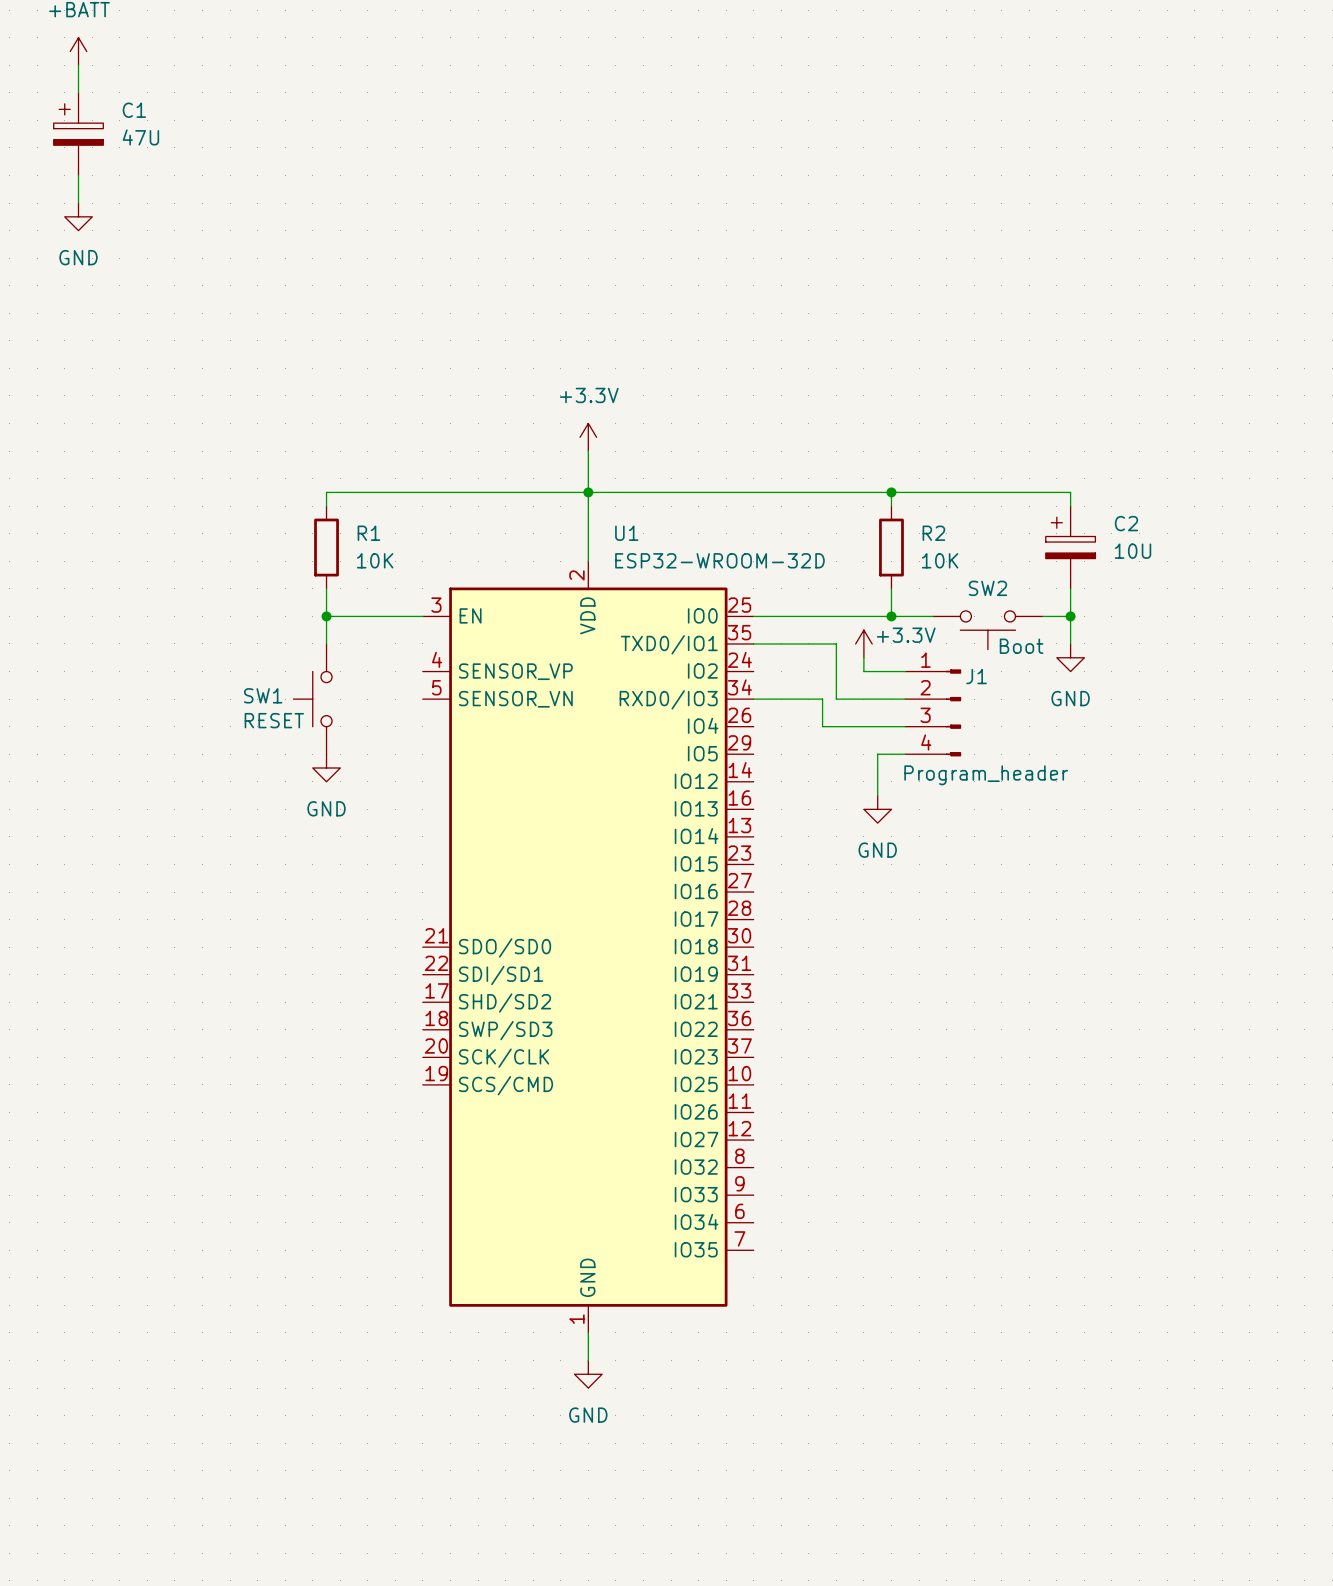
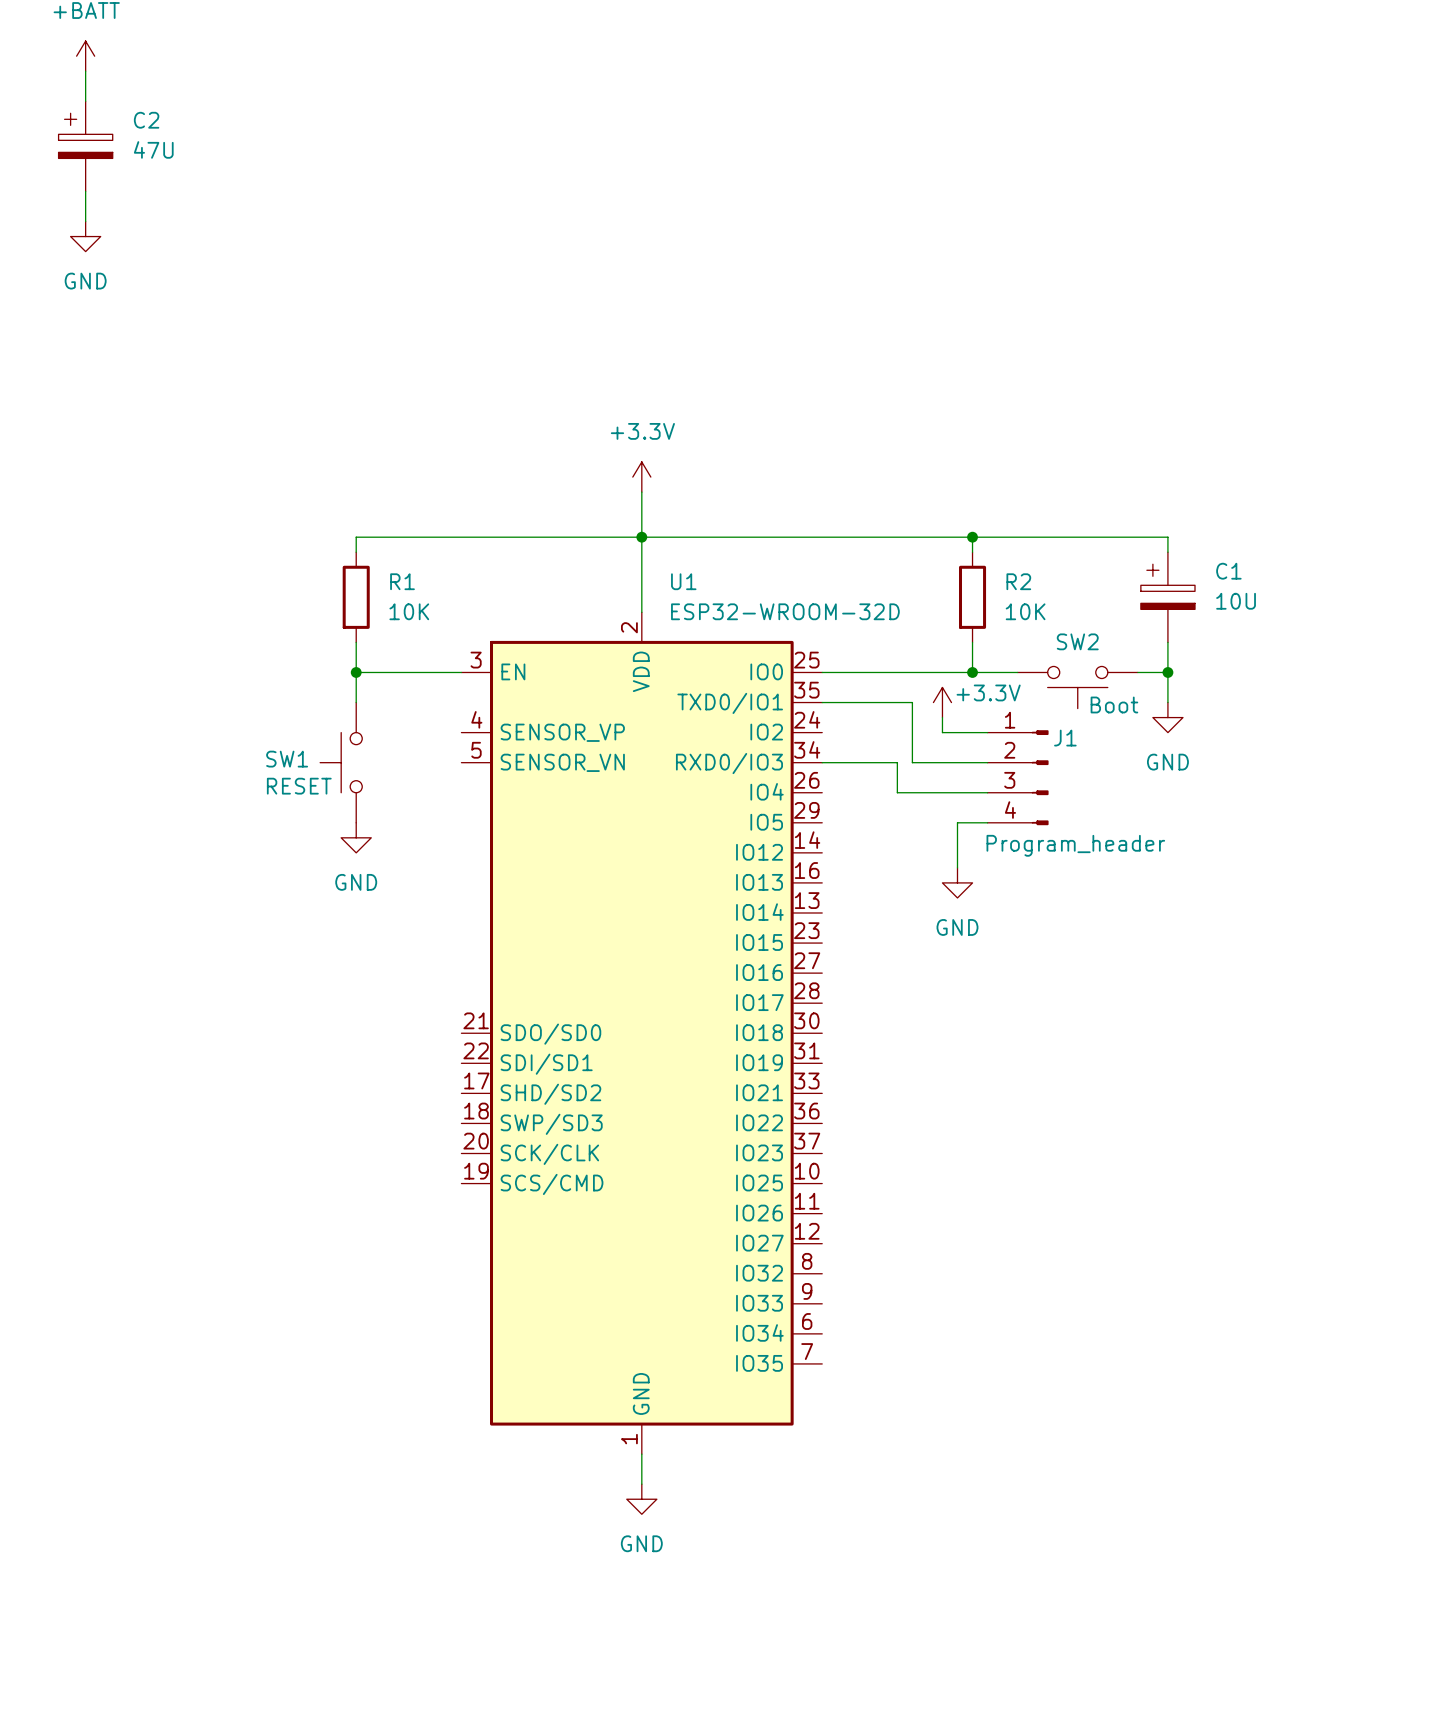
C1 name: C1 (134, 110) -> C2 (146, 120)
C2 name: C2 (1126, 523) -> C1 (1228, 571)

